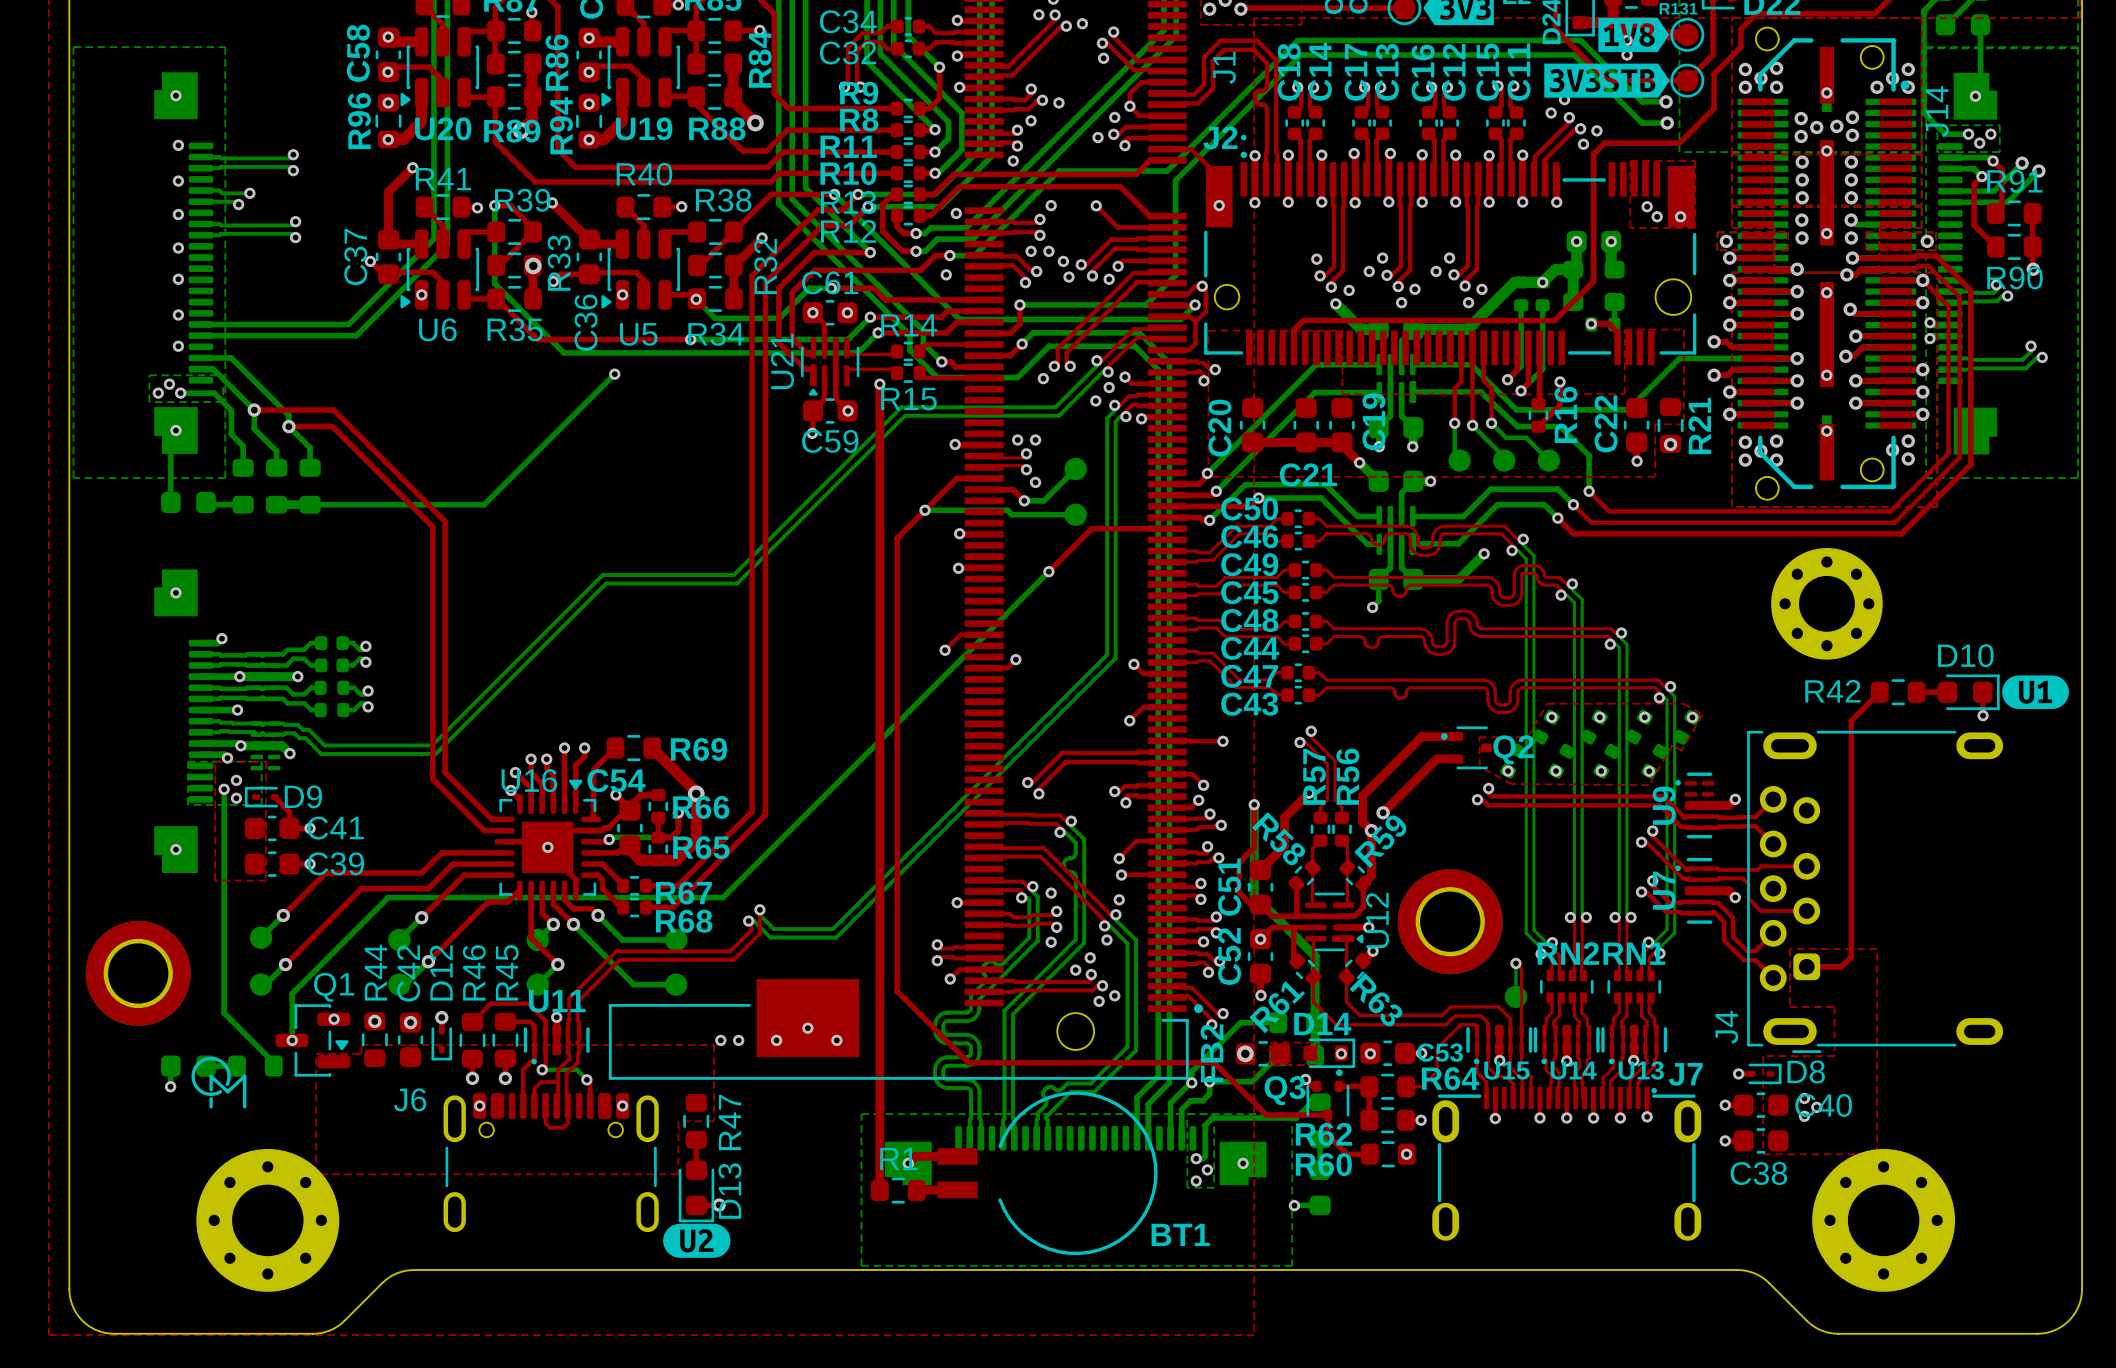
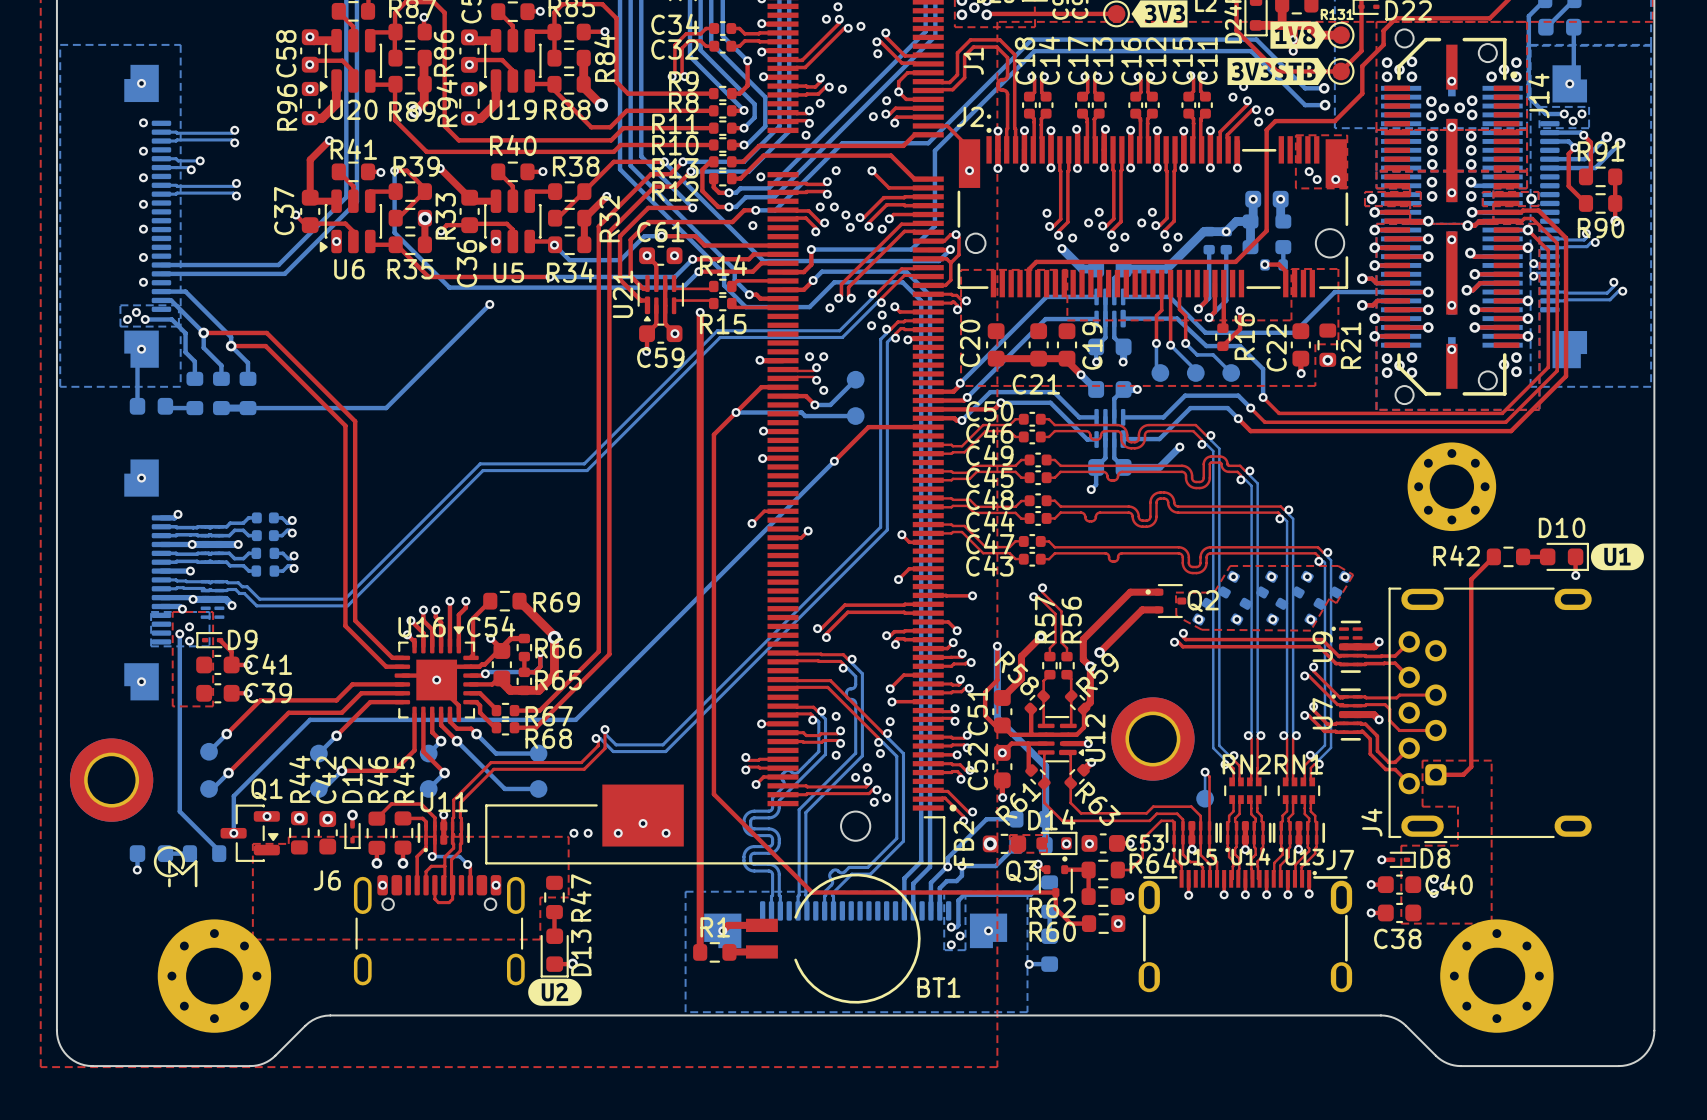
top track: (519, 889) (507, 902) (488, 902) (428, 961) -> (414, 714) (414, 750) (394, 770) (341, 770)
top track: (968, 1062) (1214, 1062) (1266, 1115) -> (770, 850) (812, 892) (1007, 892)

